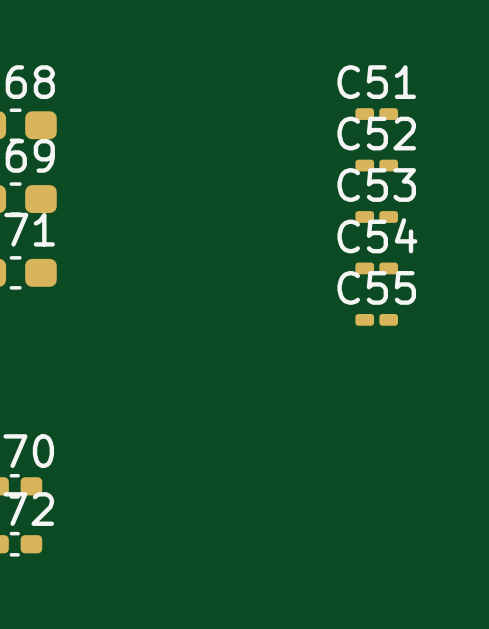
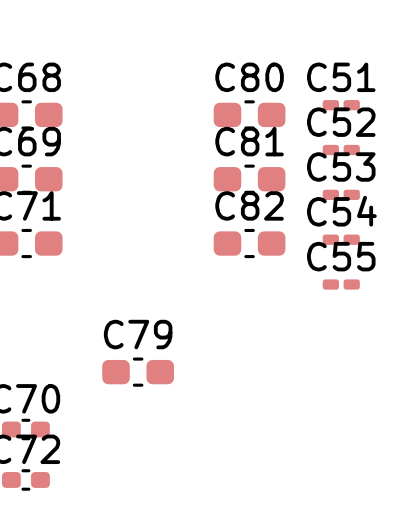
C80: none -> (249, 114)
C81: none -> (249, 179)
C82: none -> (249, 243)
C79: none -> (138, 372)

